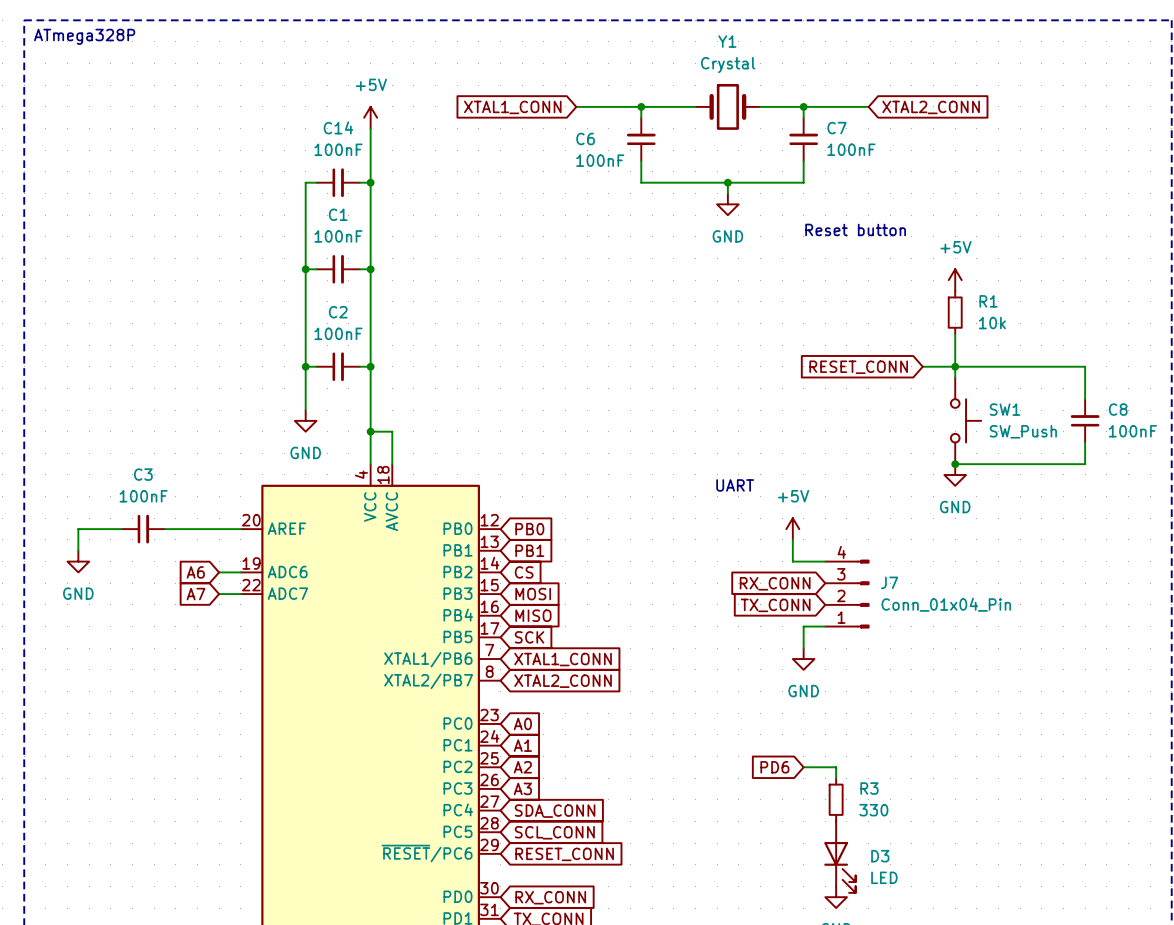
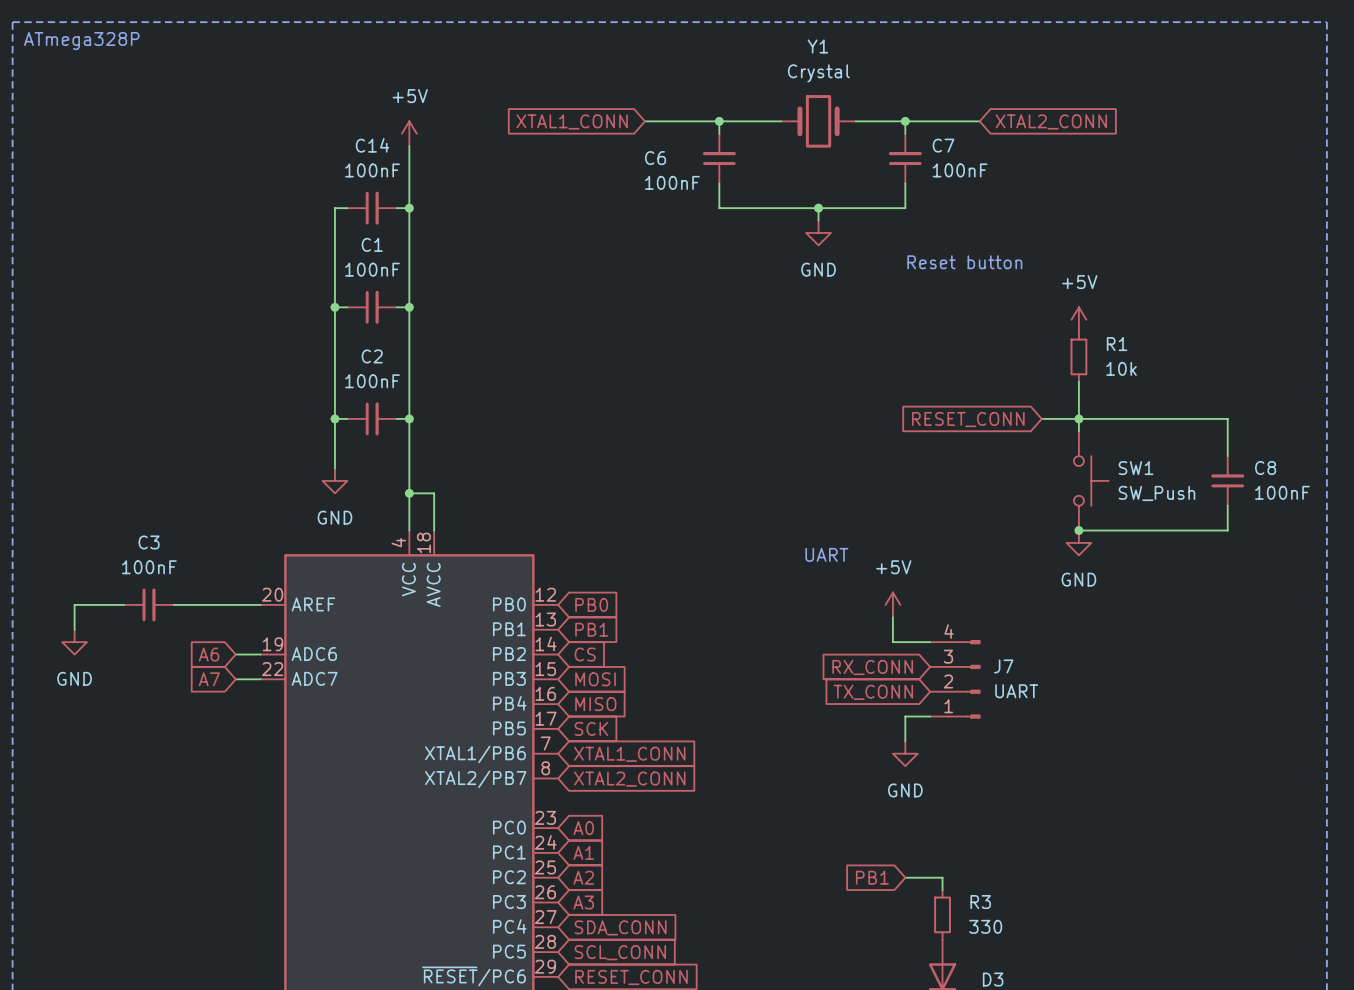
J7 value: Conn_01x04_Pin (946, 604) -> UART (1016, 691)
global label: PD6 (774, 767) -> PB1 (872, 877)

